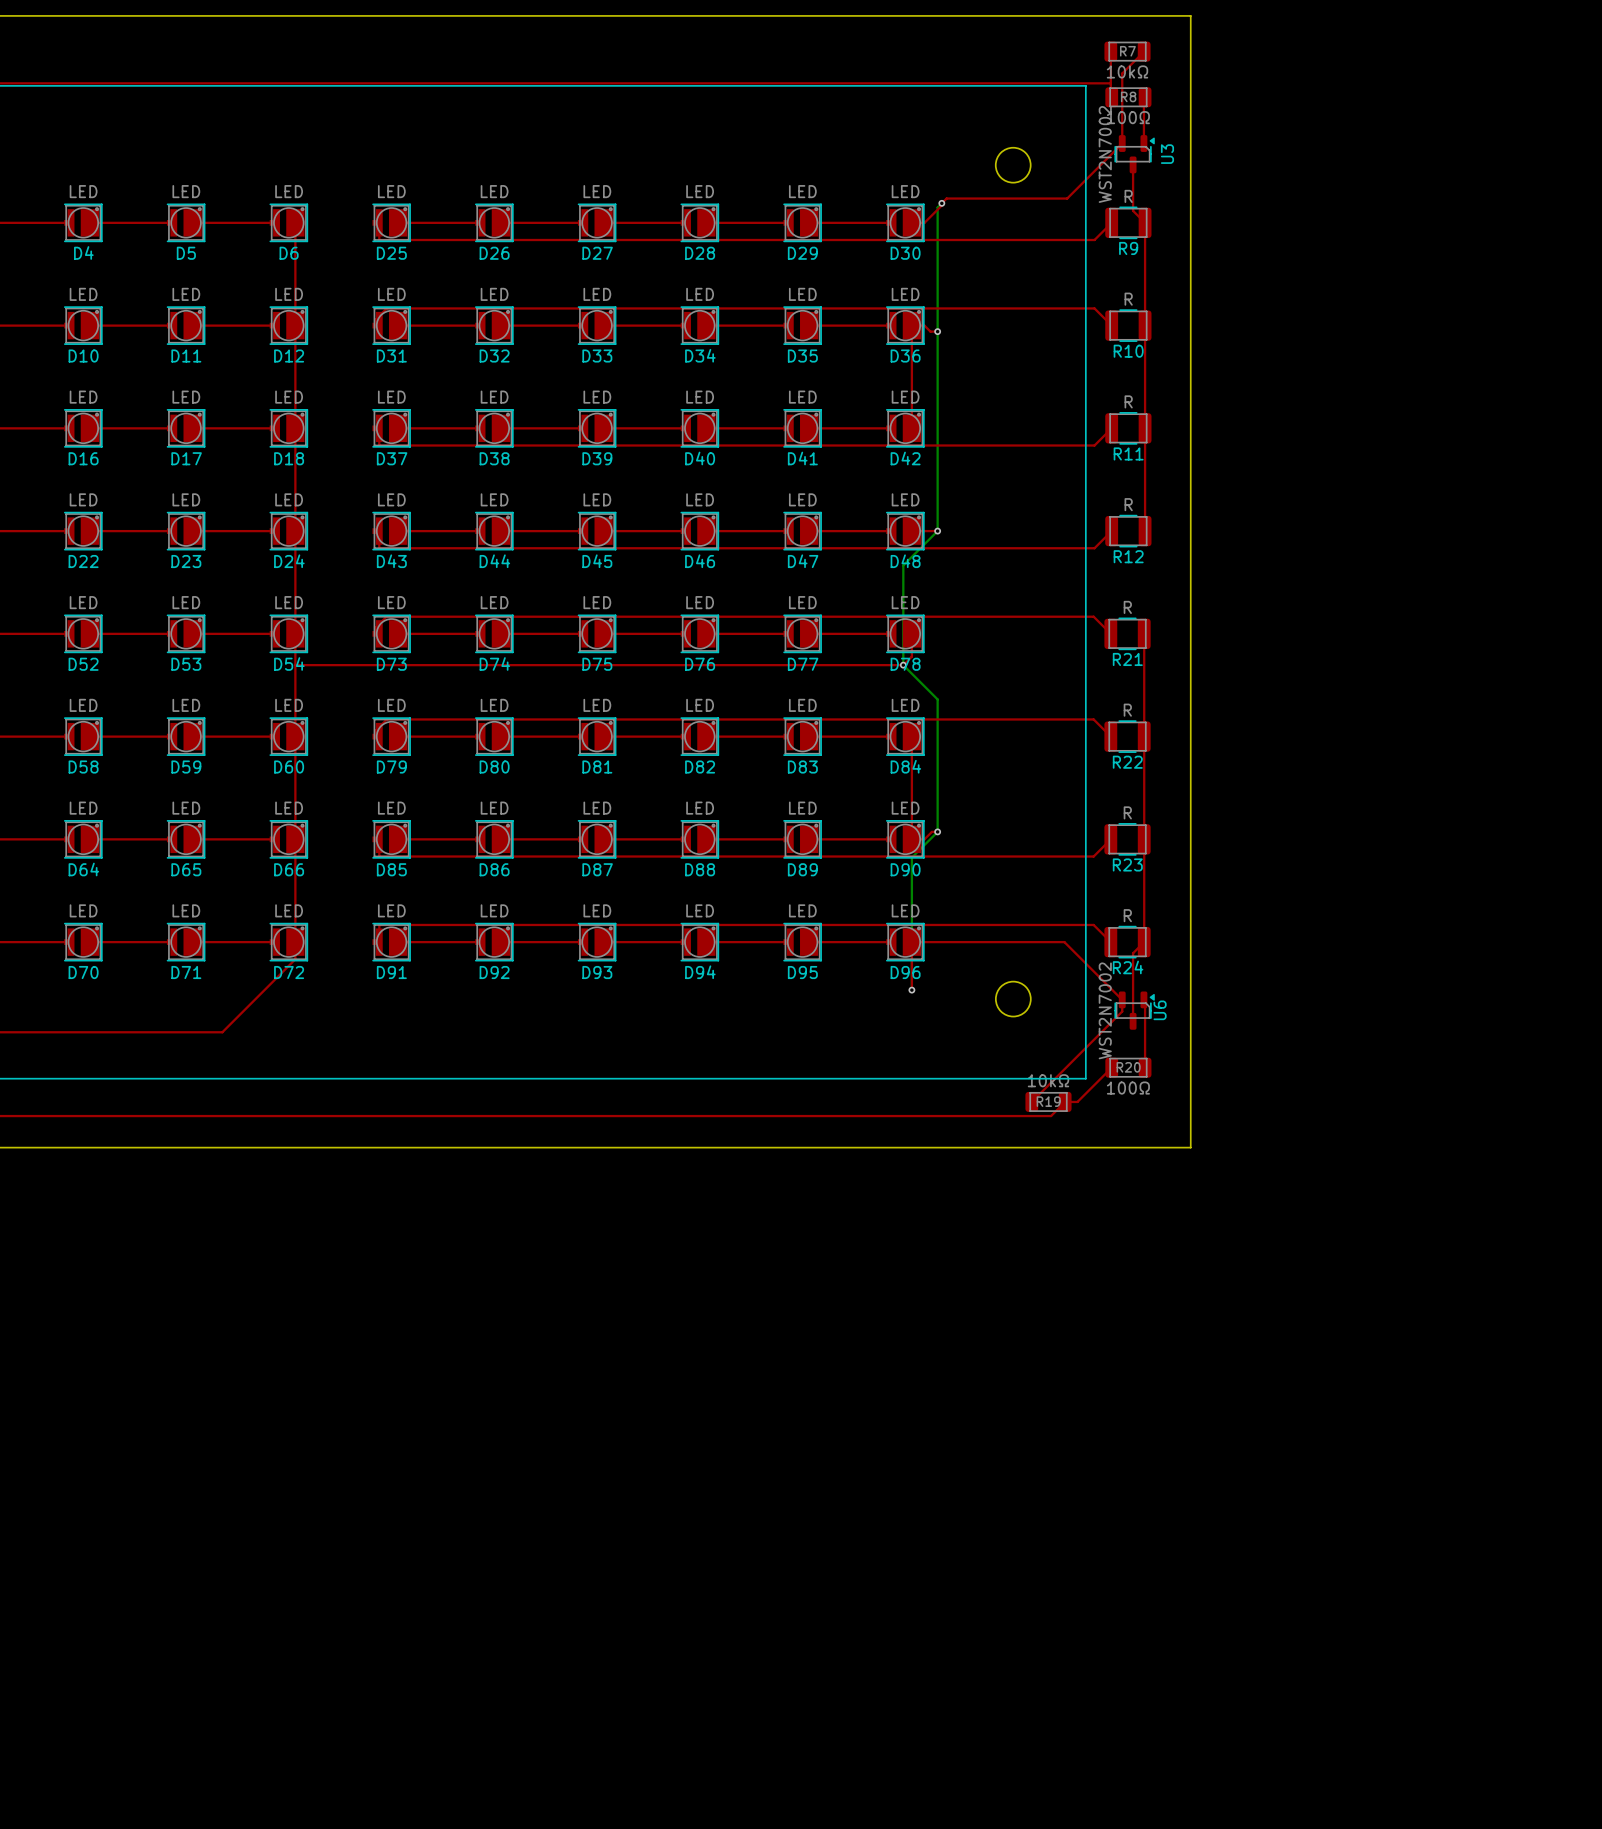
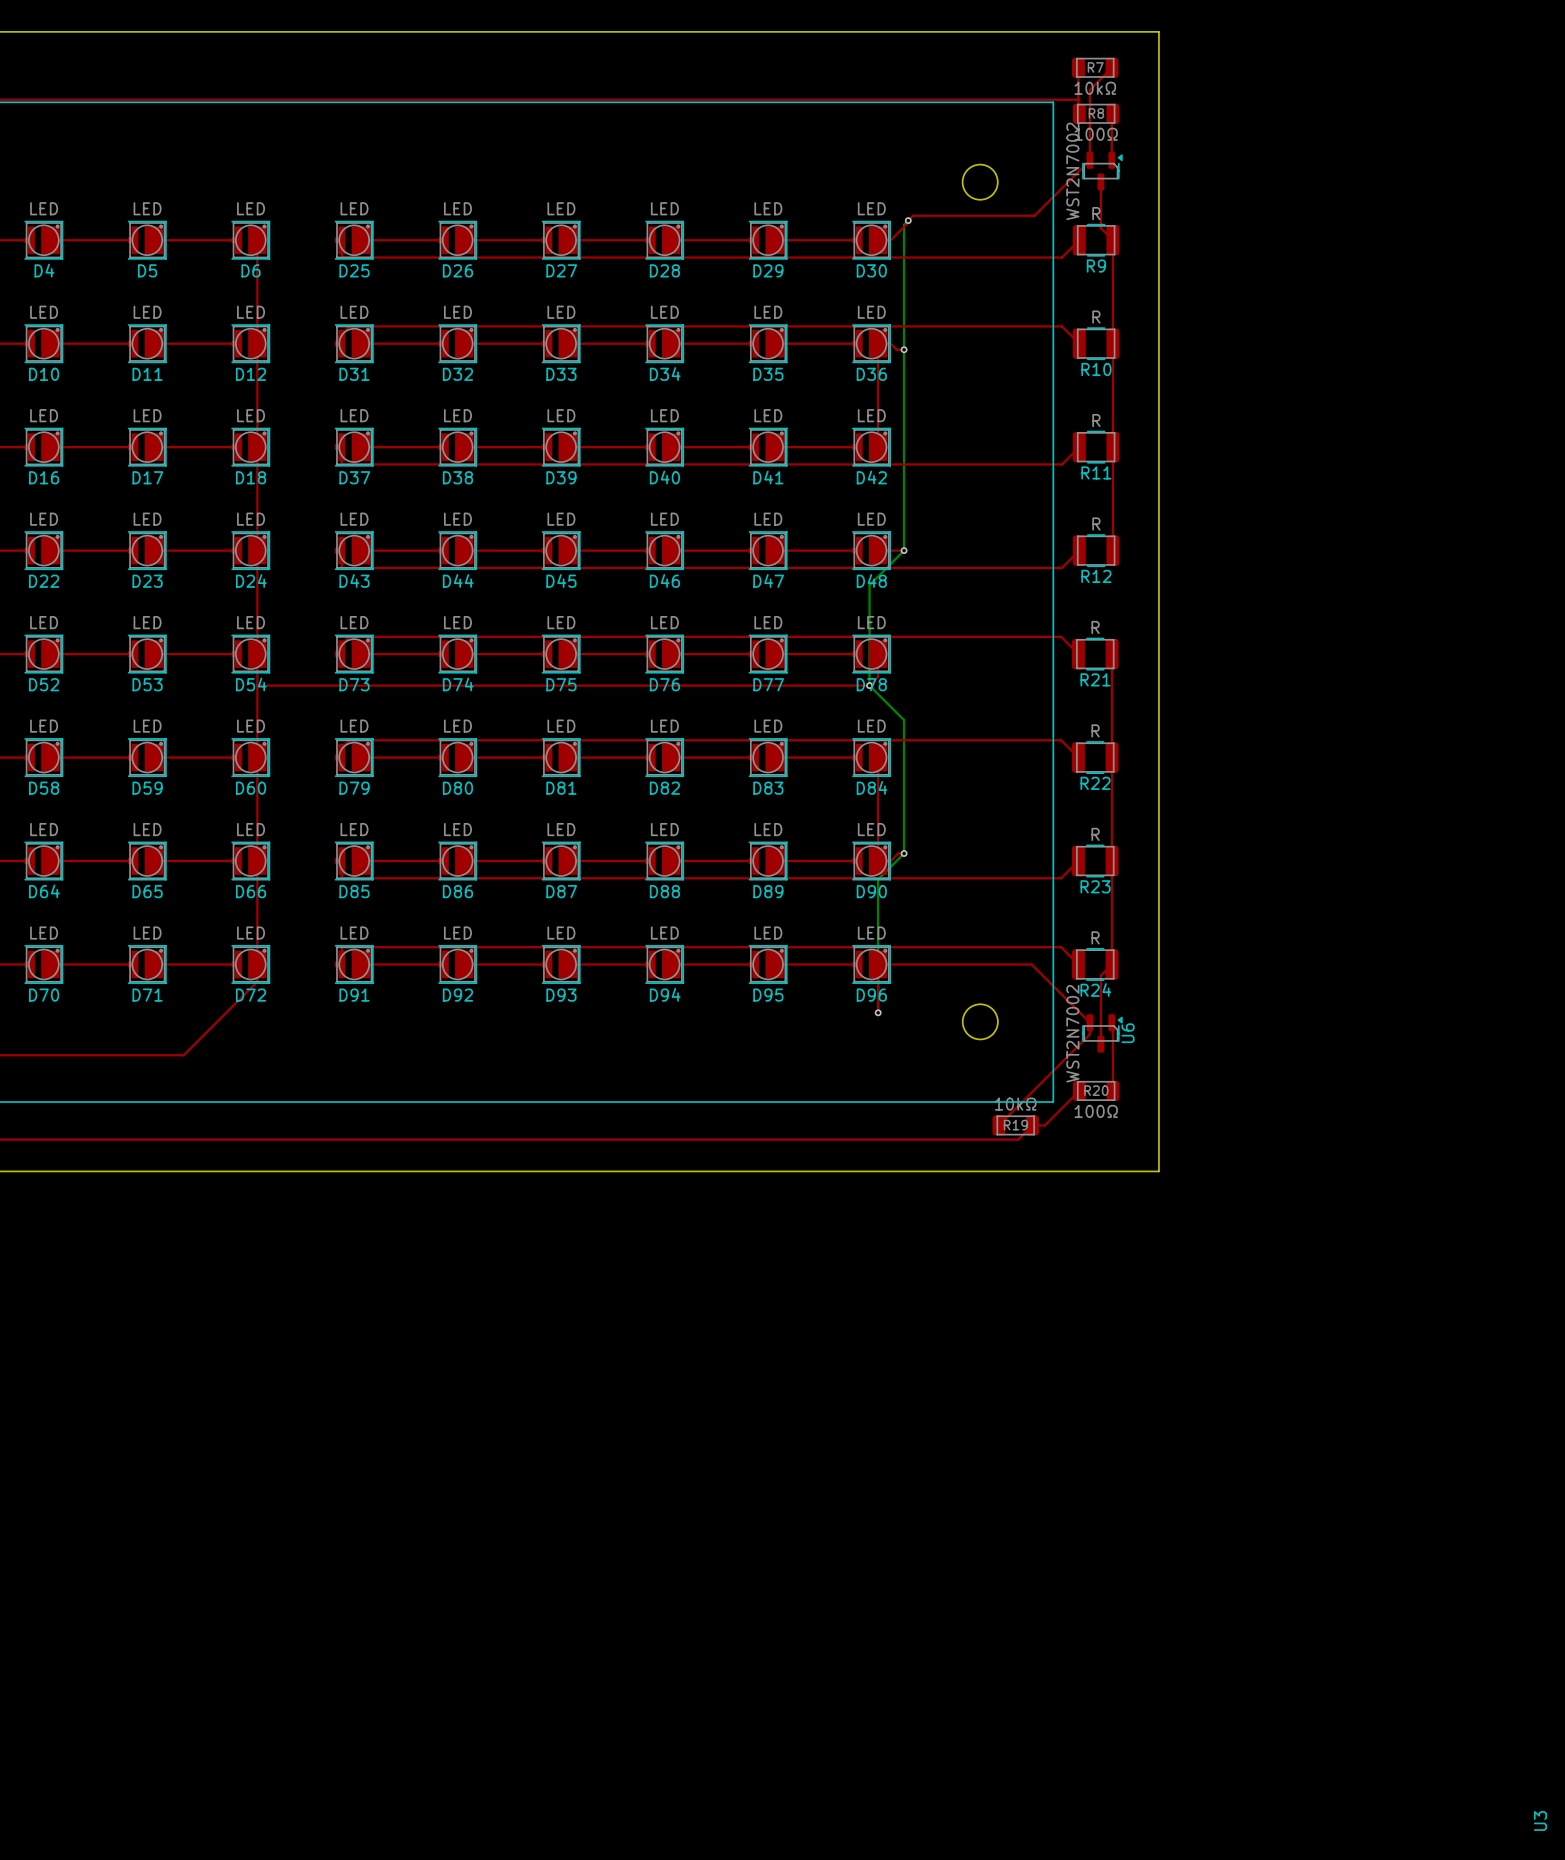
U3 name position: U3 (1167, 154) -> U3 (1540, 1820)

